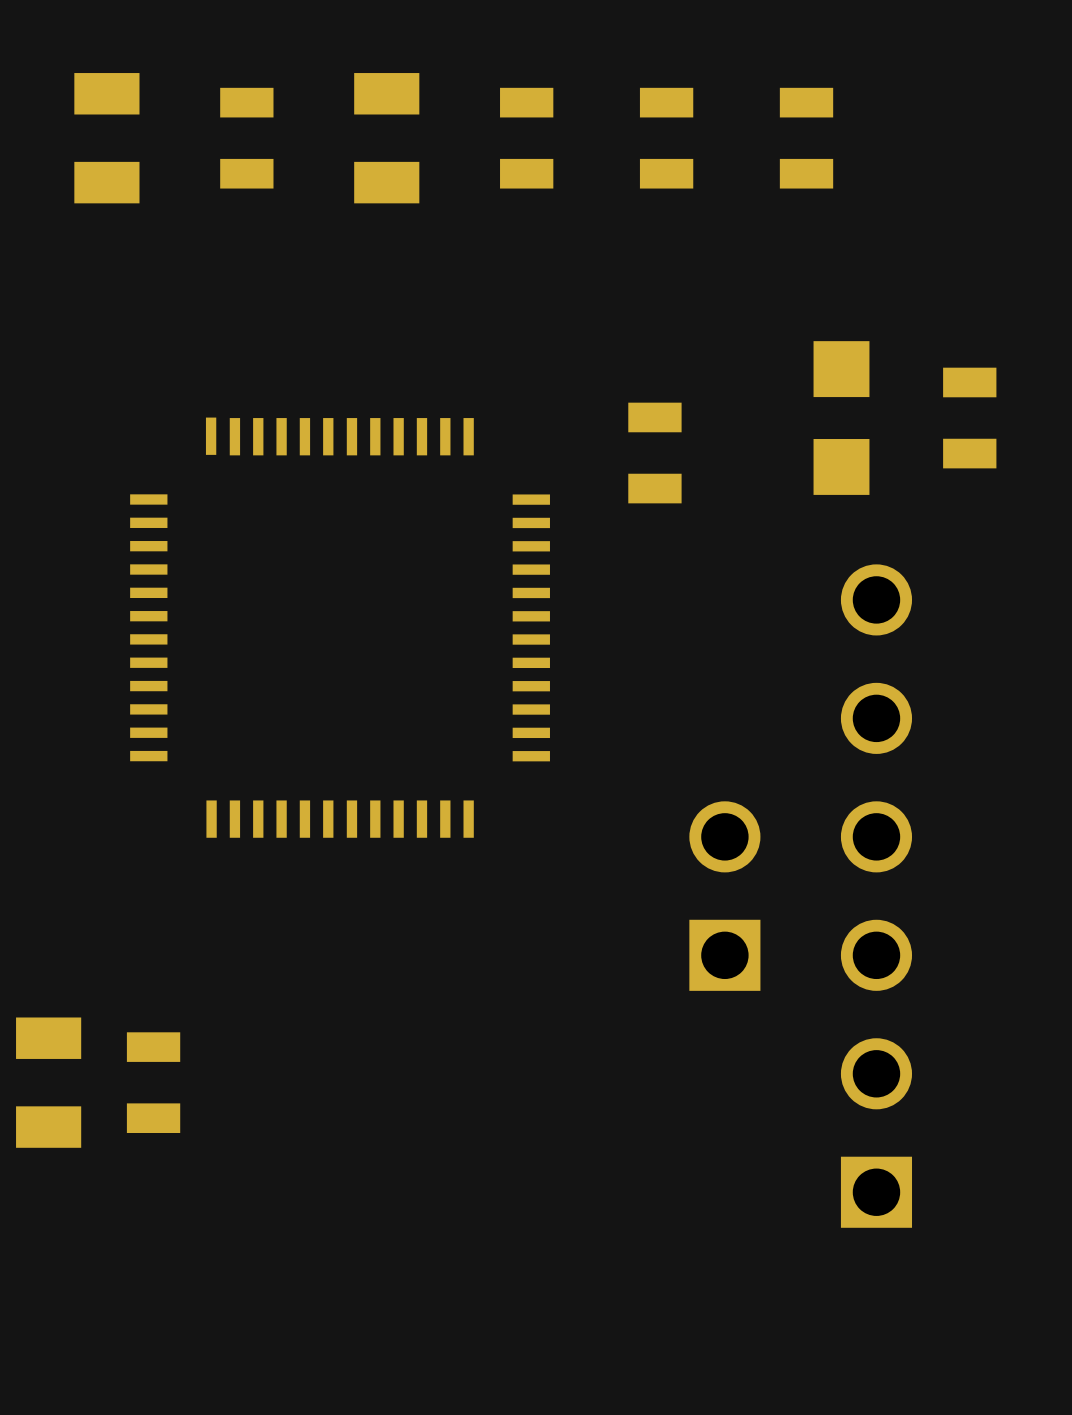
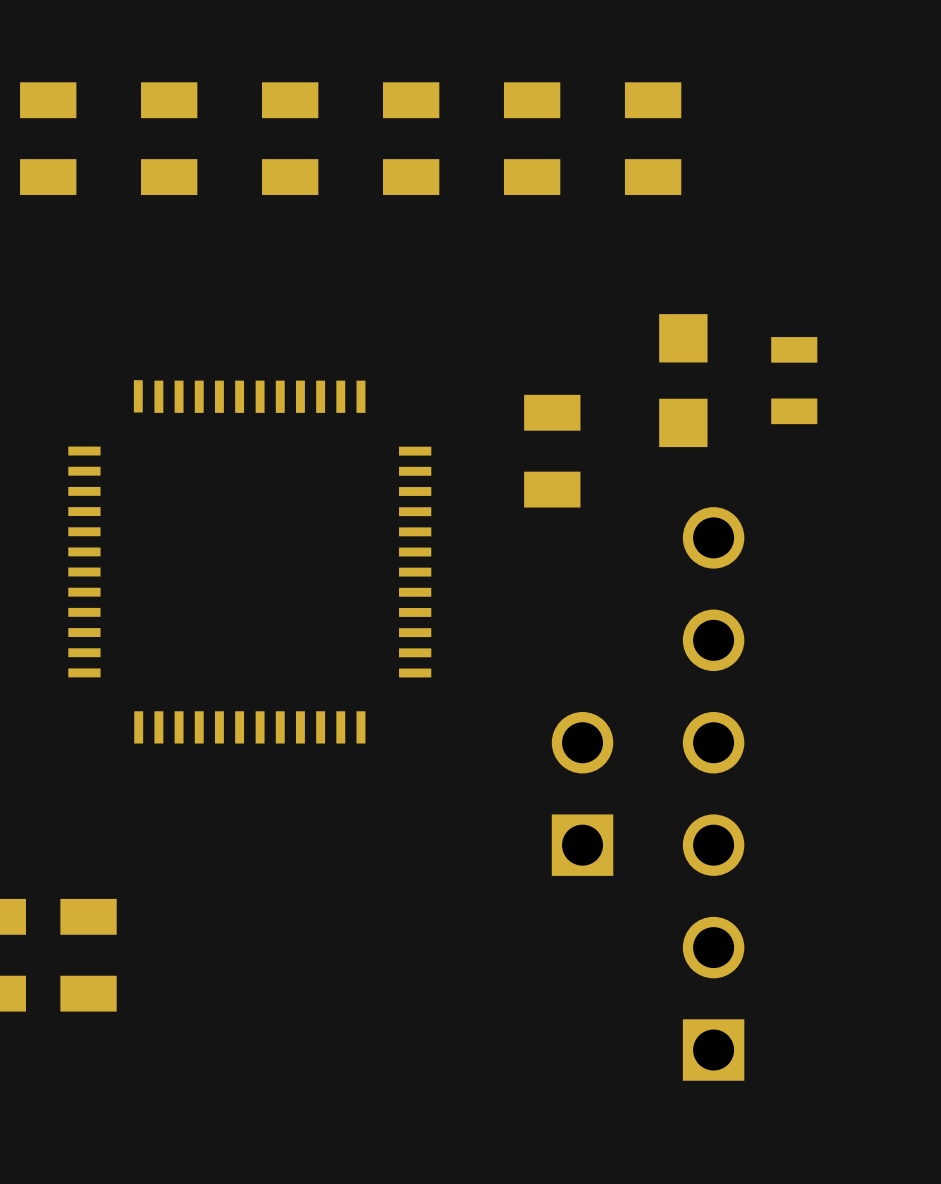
part footprint: [220, 87, 274, 189] -> [141, 82, 198, 195]
part footprint: [500, 87, 554, 189] -> [382, 82, 440, 195]
part footprint: [639, 87, 694, 189] -> [503, 82, 561, 195]
part footprint: [779, 87, 834, 189] -> [624, 82, 682, 195]
part: (654, 453) -> none
part: none -> (552, 451)
part footprint: [126, 1032, 181, 1133] -> [60, 898, 117, 1012]

